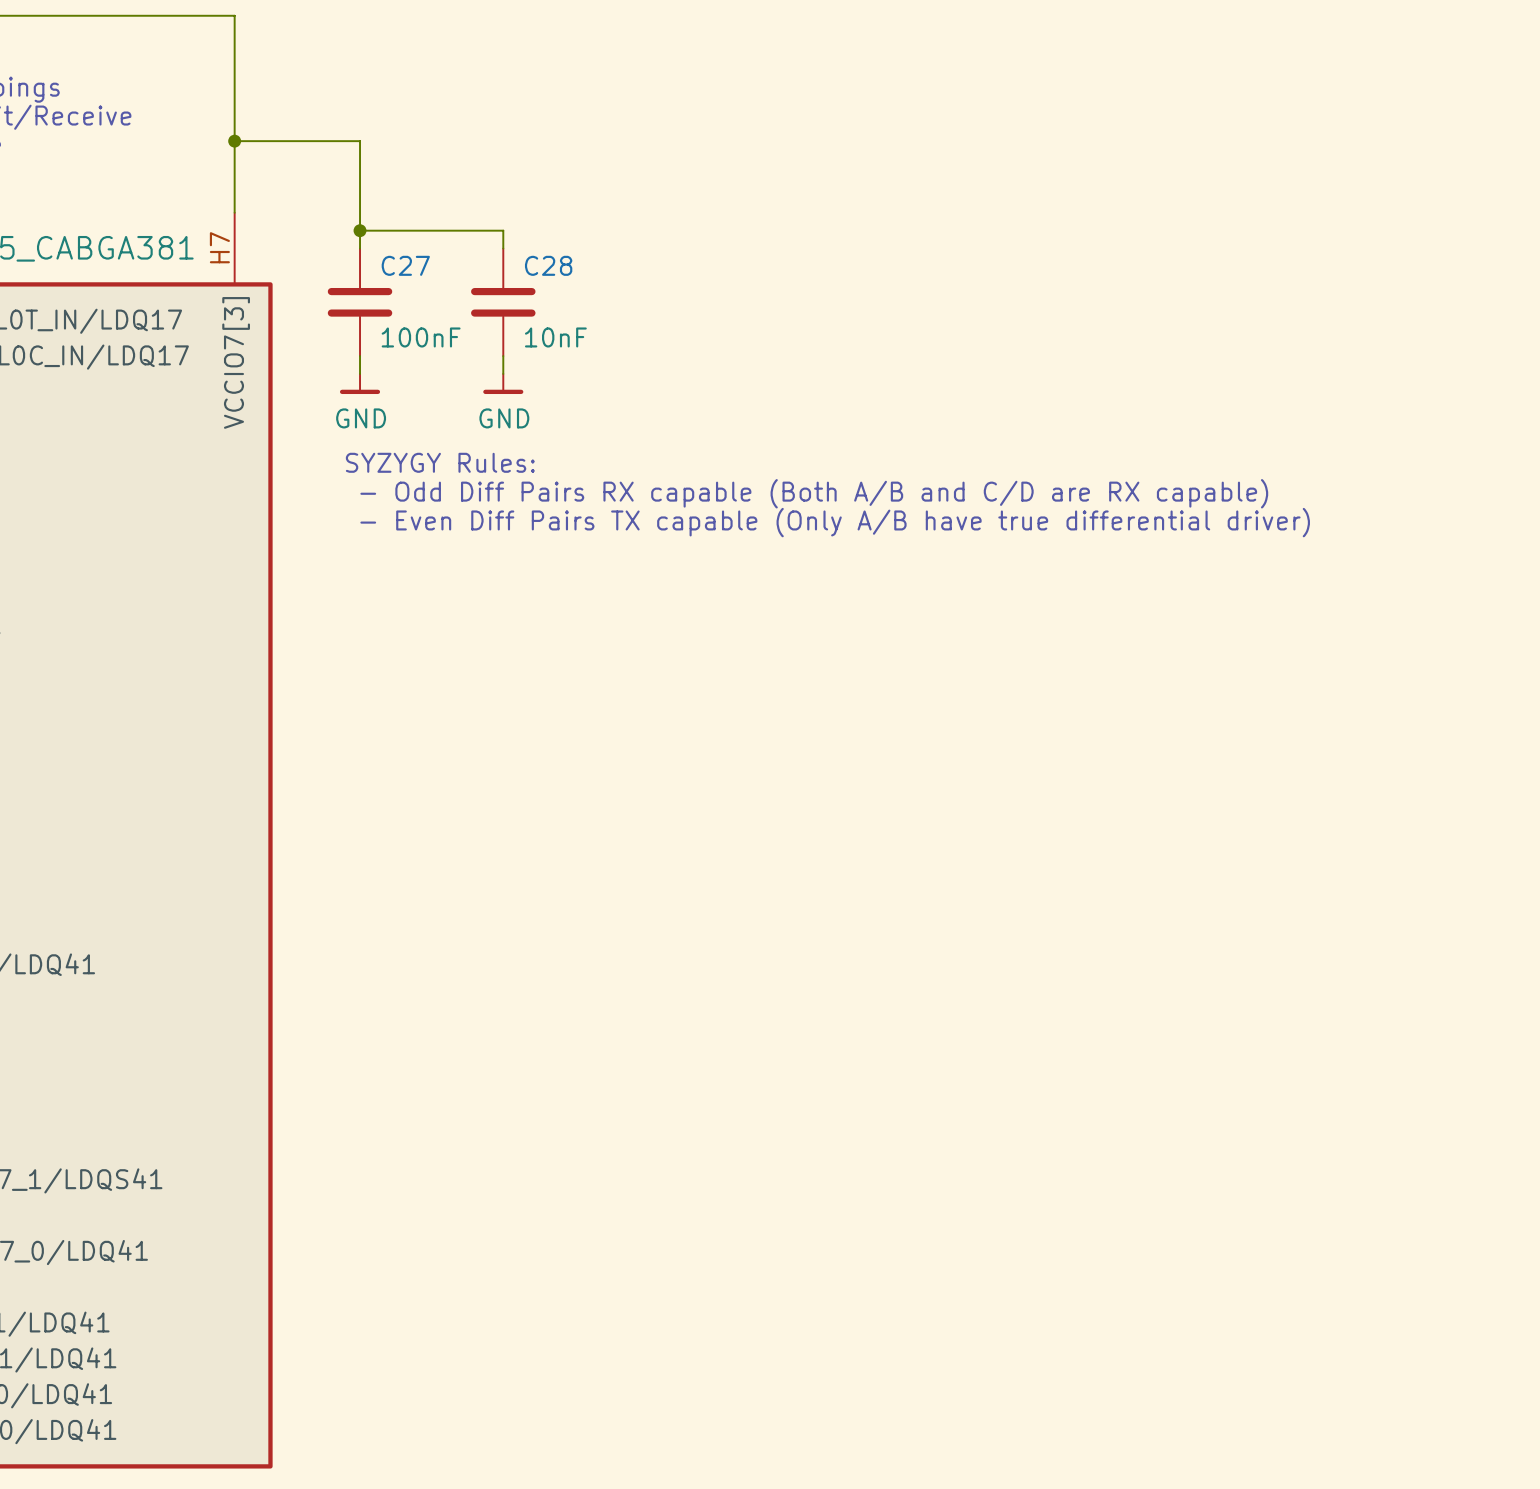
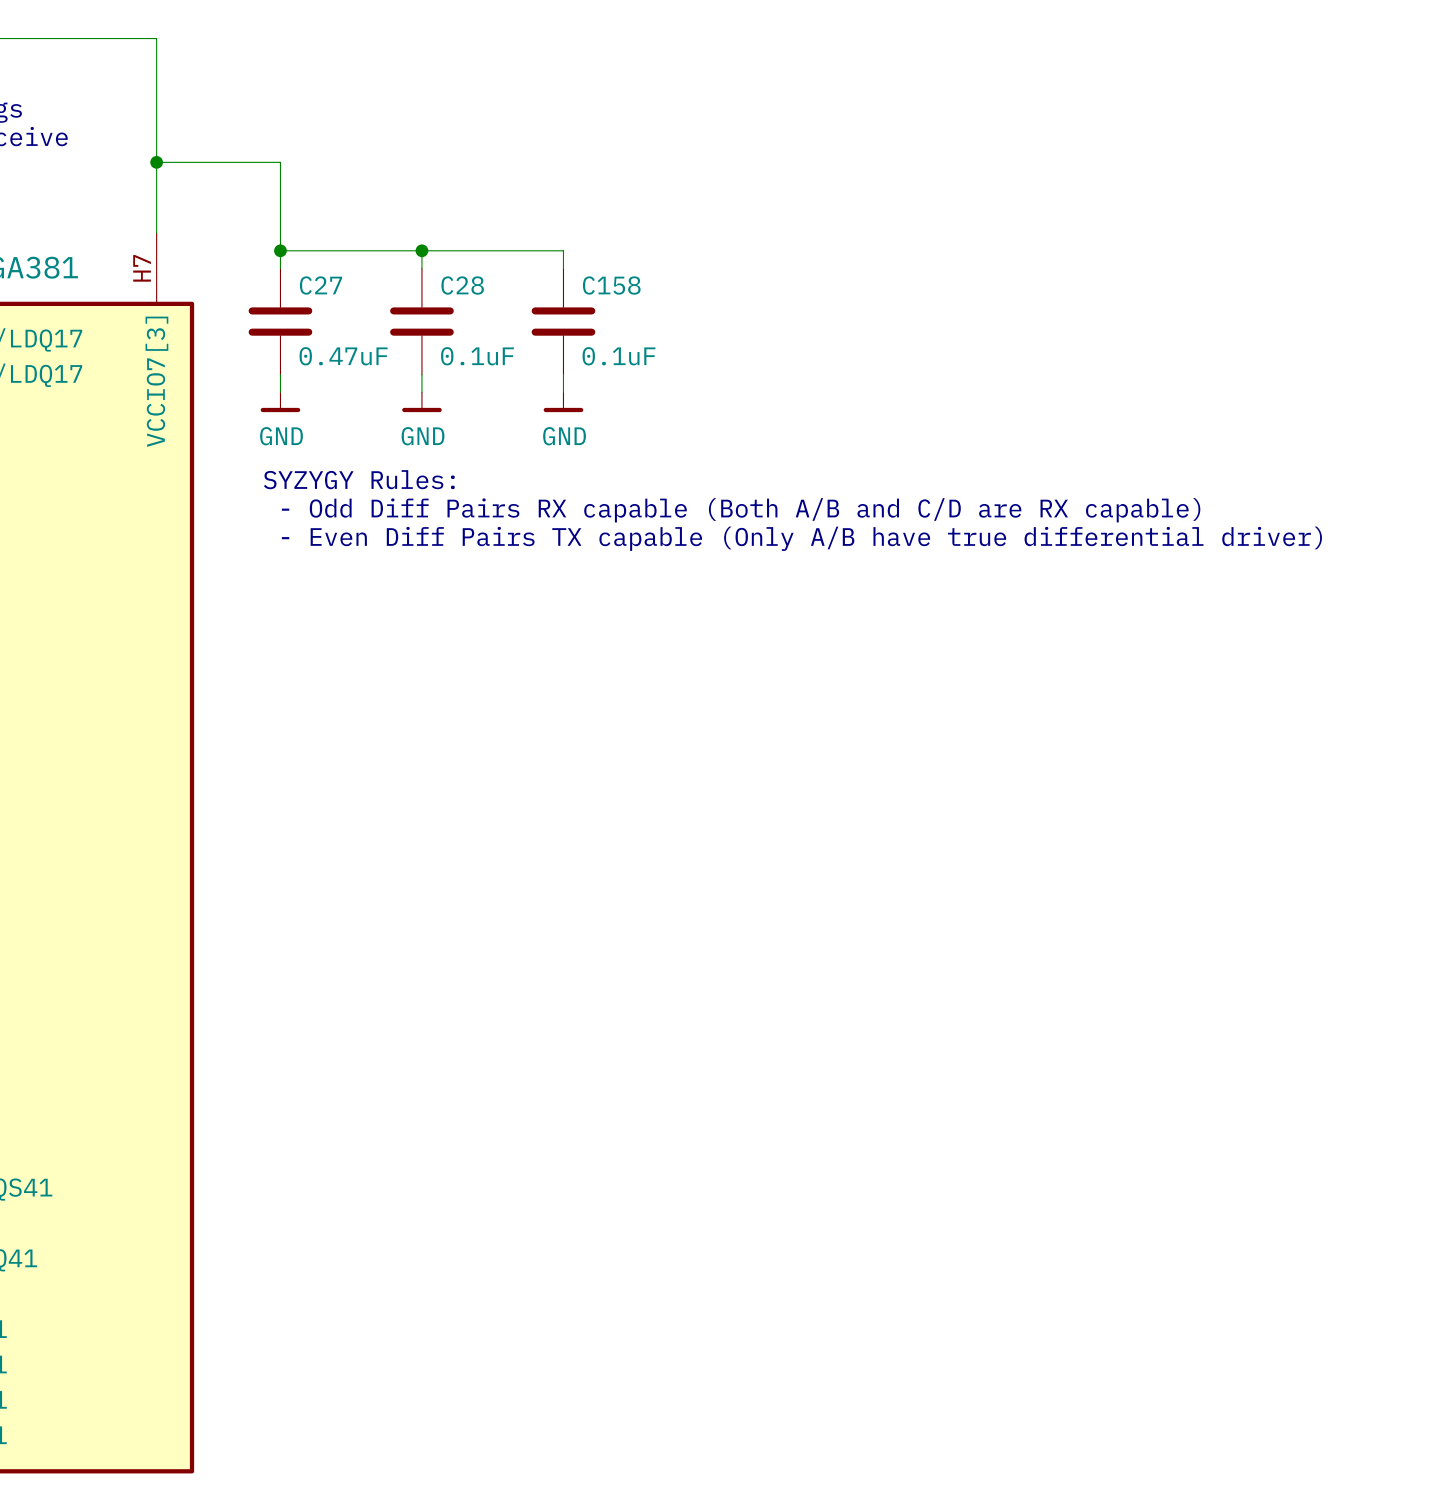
wire: none -> (421, 250) (563, 250) (563, 268)
junction: none -> (421, 250)
C158: none -> 0.1uF (563, 321)
C27 value: 100nF (421, 337) -> 0.47uF (343, 356)
C28 value: 10nF (555, 337) -> 0.1uF (477, 356)
wire: none -> (563, 374) (563, 392)
power symbol: none -> GND (563, 402)

